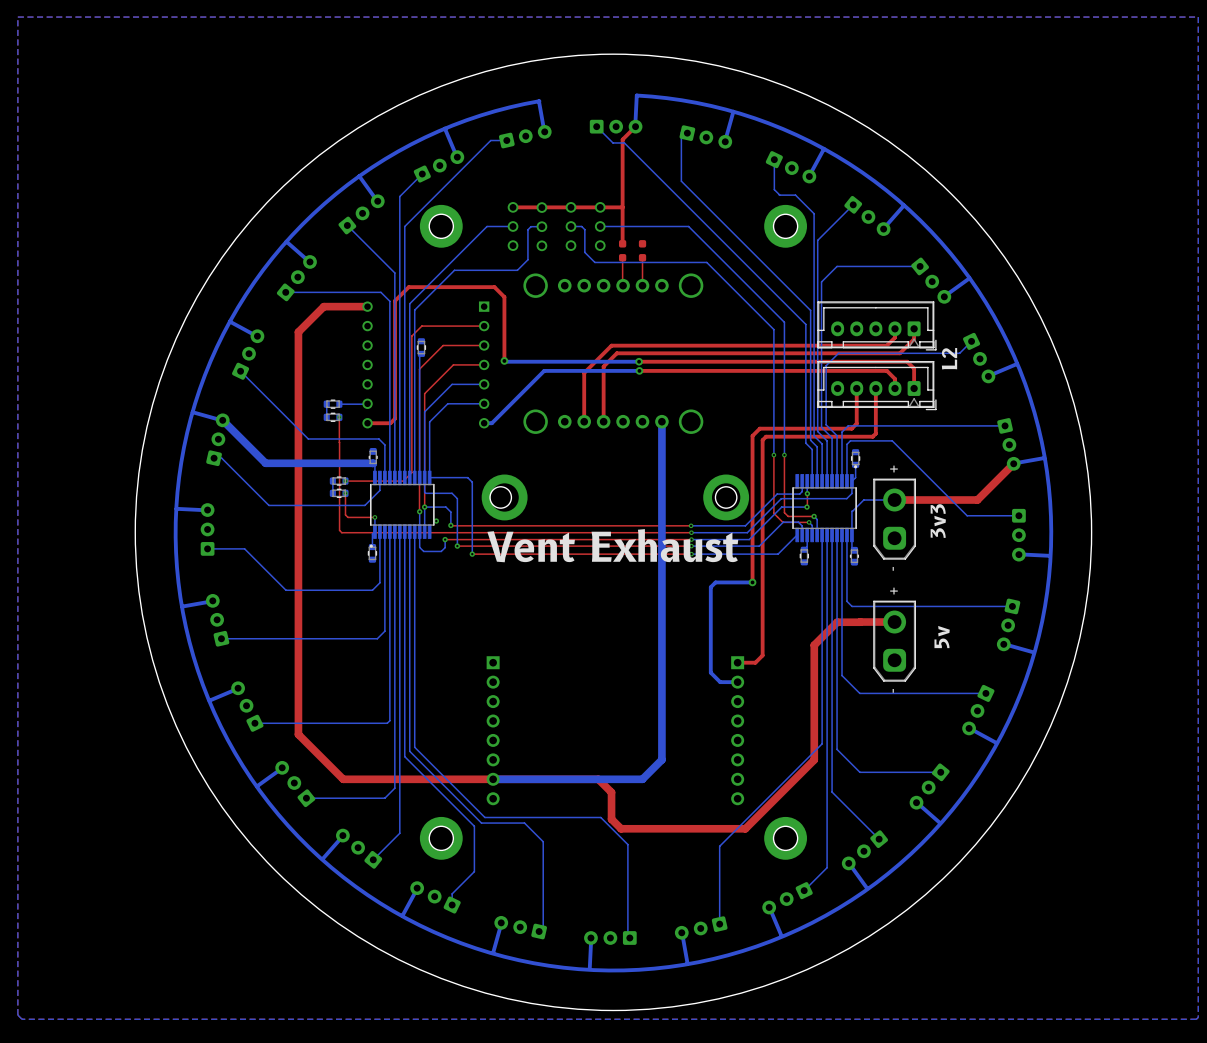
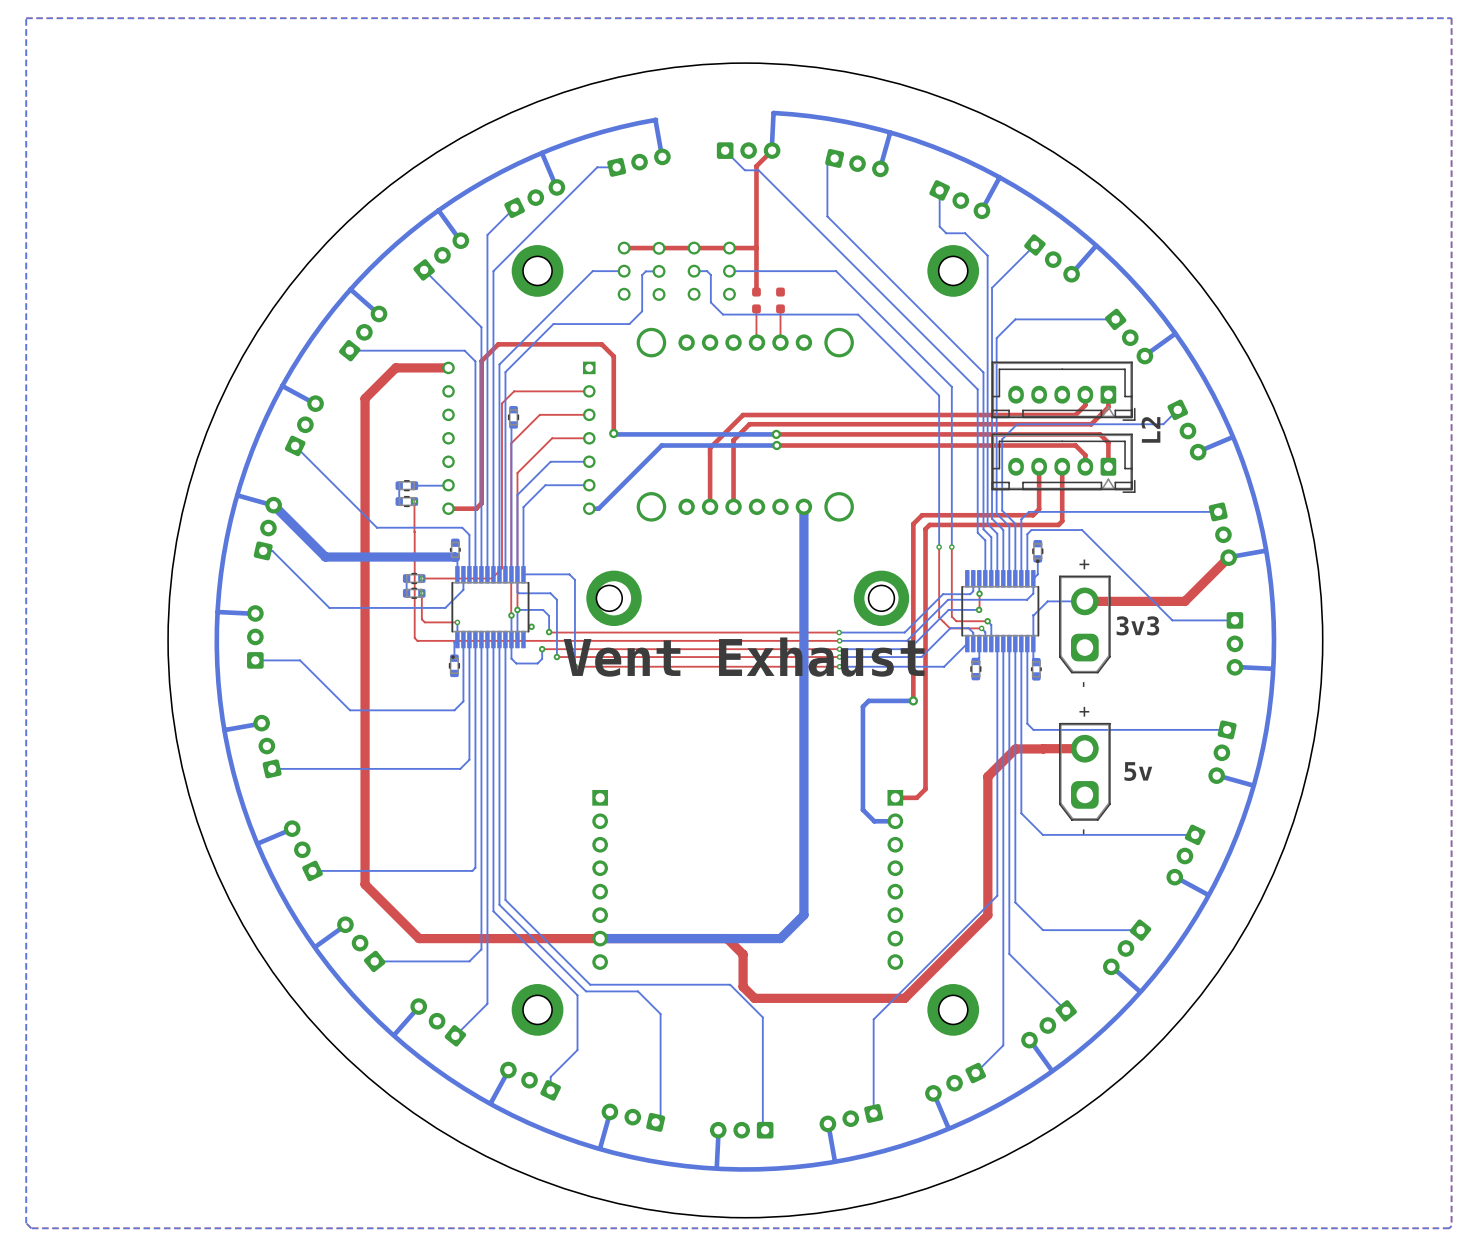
text rotation: 0° (938, 521) -> 90° clockwise (1137, 625)
text rotation: 0° (942, 637) -> 90° clockwise (1138, 771)

